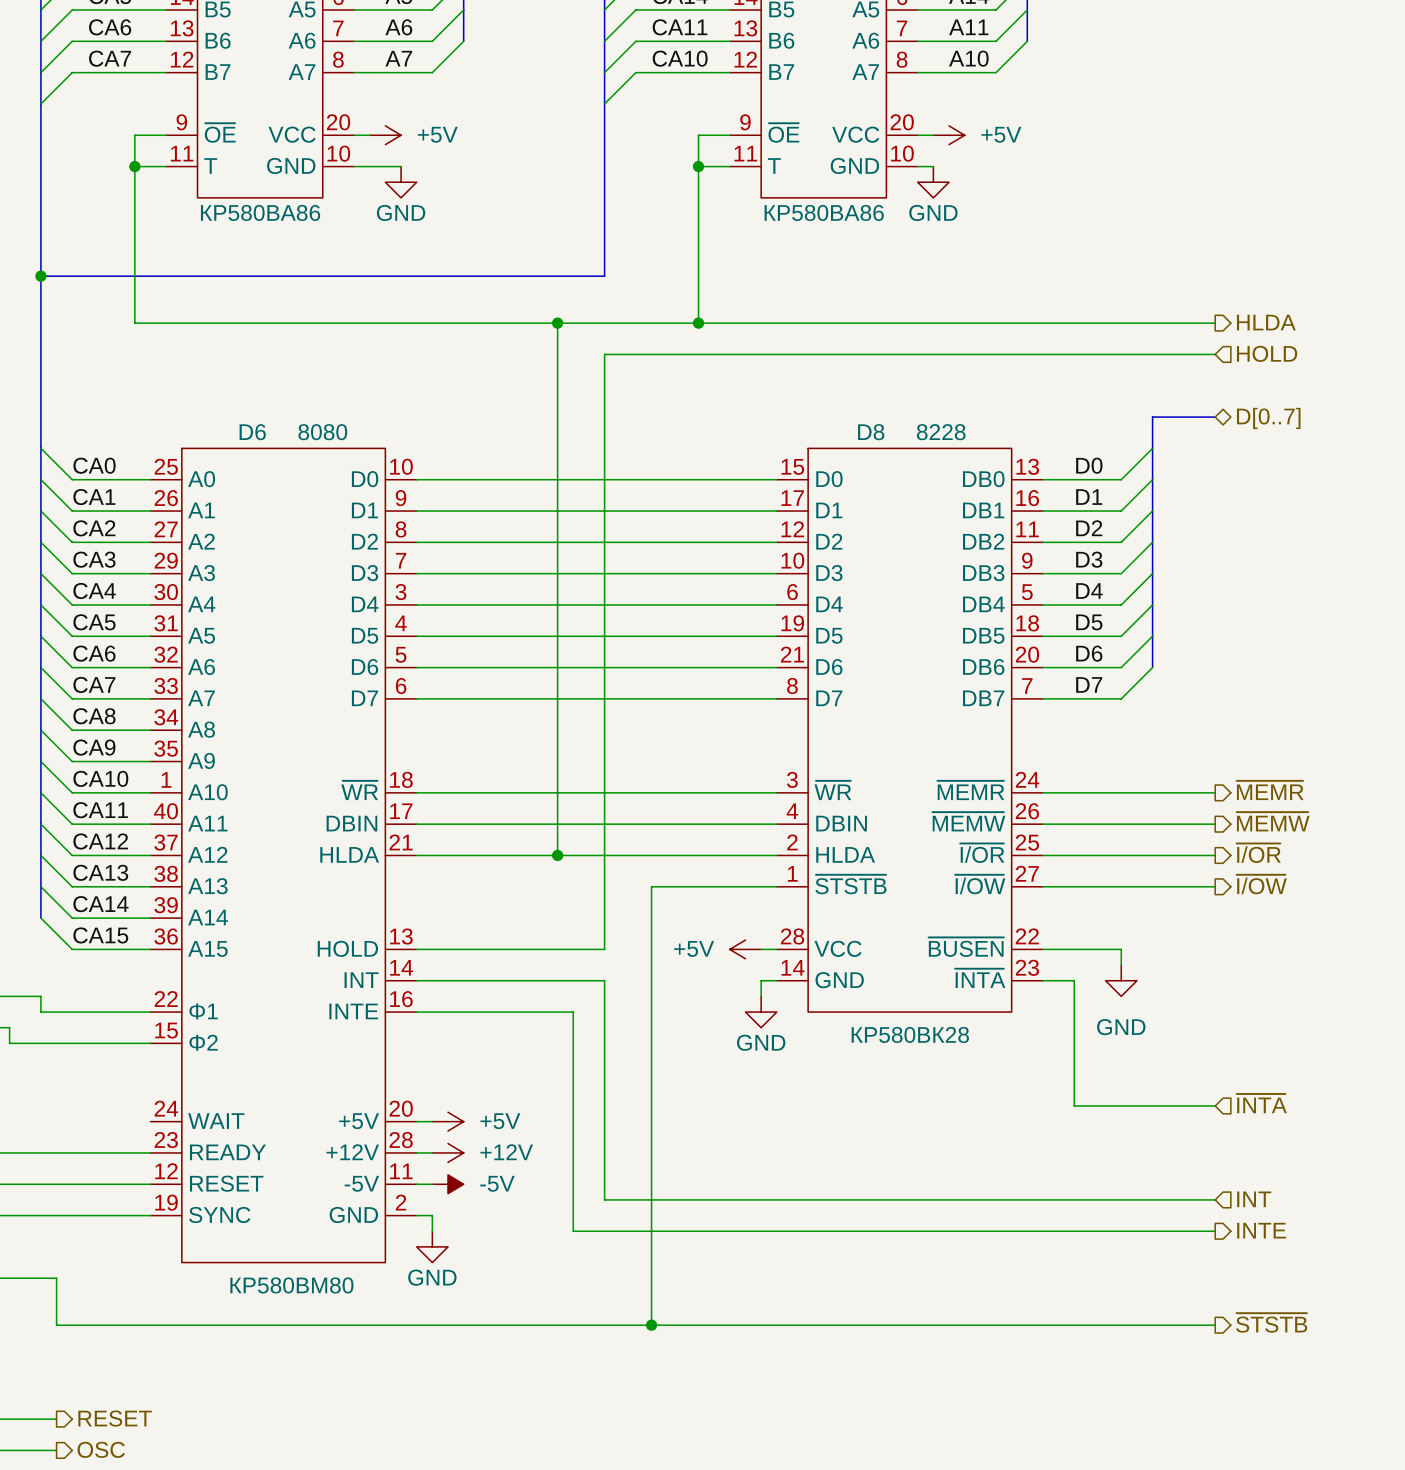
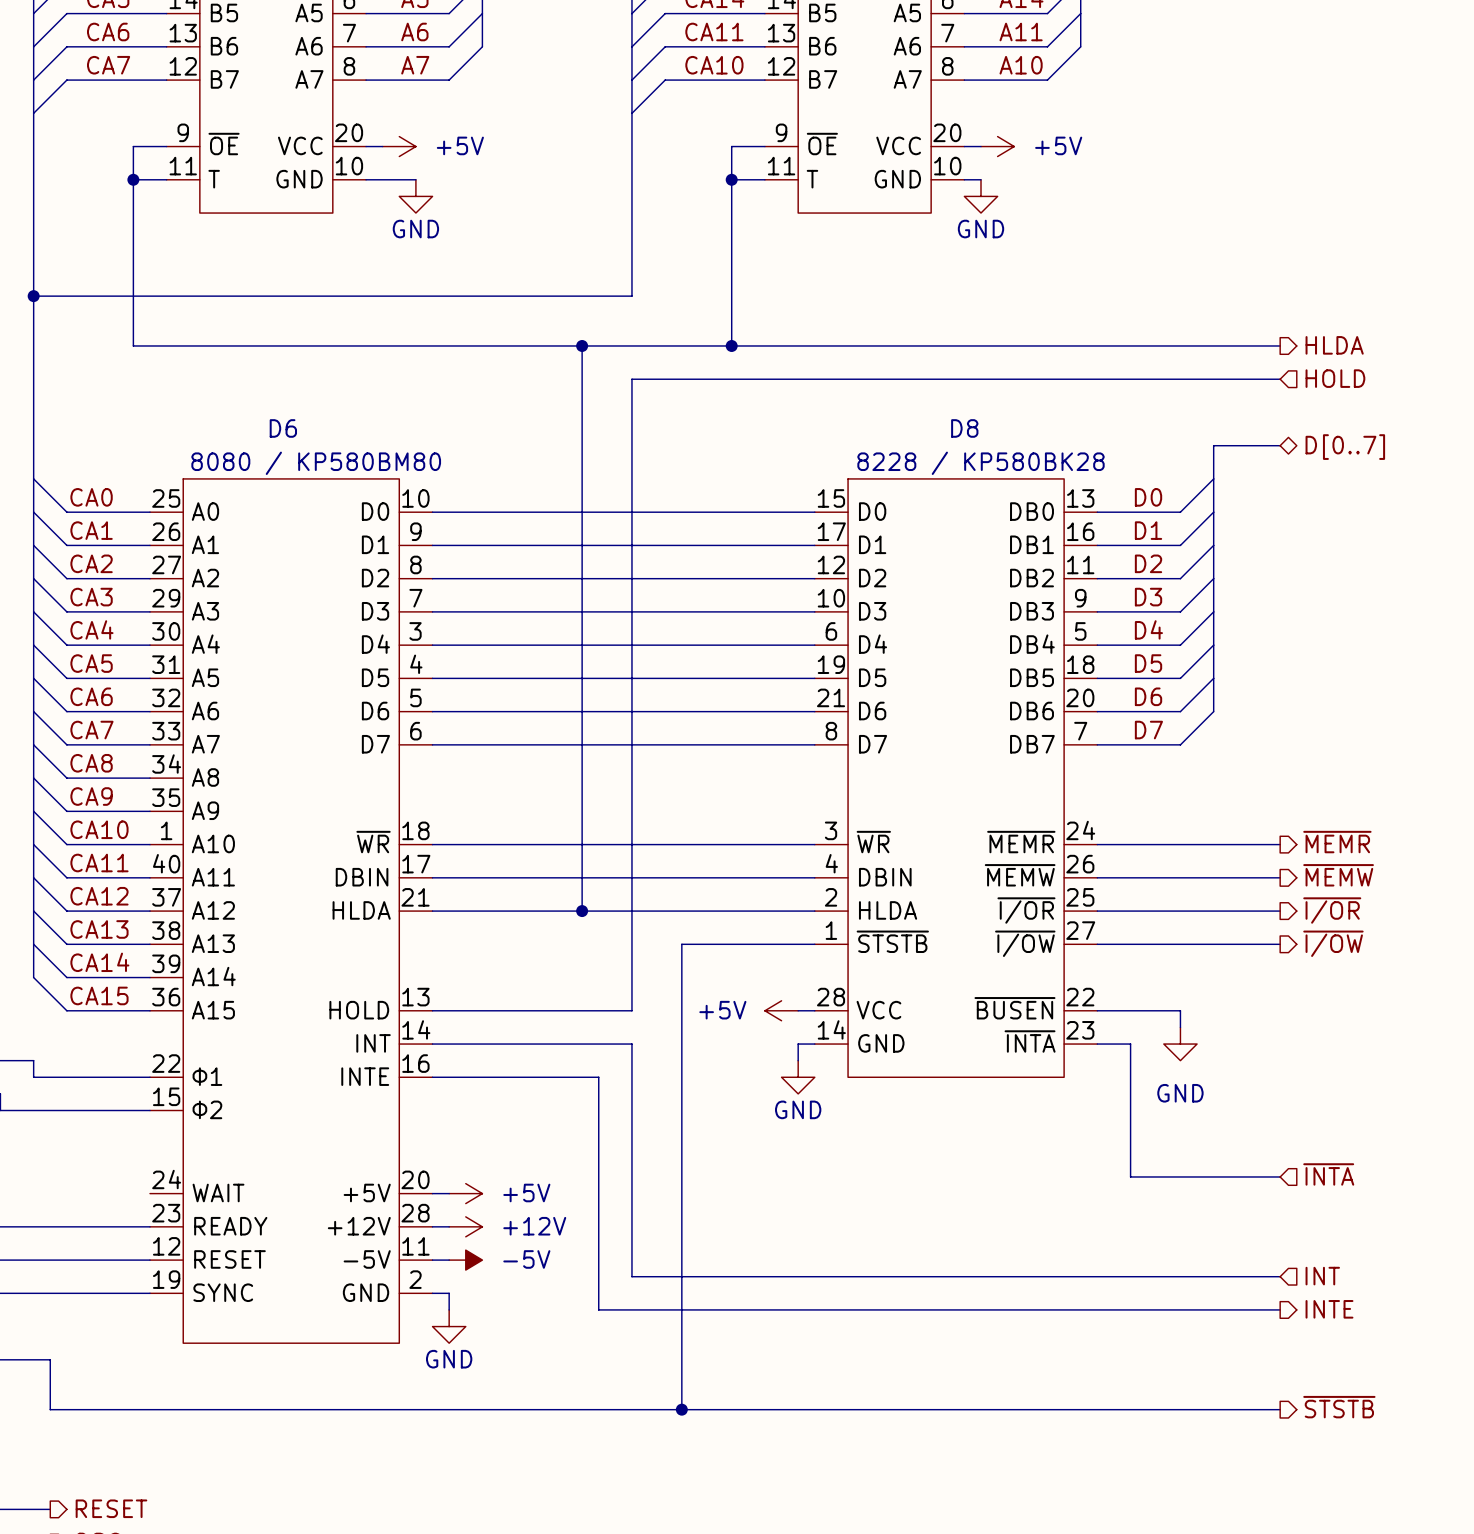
part text: КР580ВА86 (260, 212) -> none
part text: КР580ВА86 (824, 212) -> none
D6 name position: D6 (252, 432) -> D6 (283, 428)
D6 value: 8080 (322, 432) -> 8080 / КР580ВМ80 (316, 463)
D8 name position: D8 (871, 432) -> D8 (964, 428)
D8 value: 8228 (941, 432) -> 8228 / КР580ВК28 (981, 463)
D8 text: КР580ВК28 (910, 1034) -> none
D6 text: КР580ВМ80 (291, 1285) -> none

